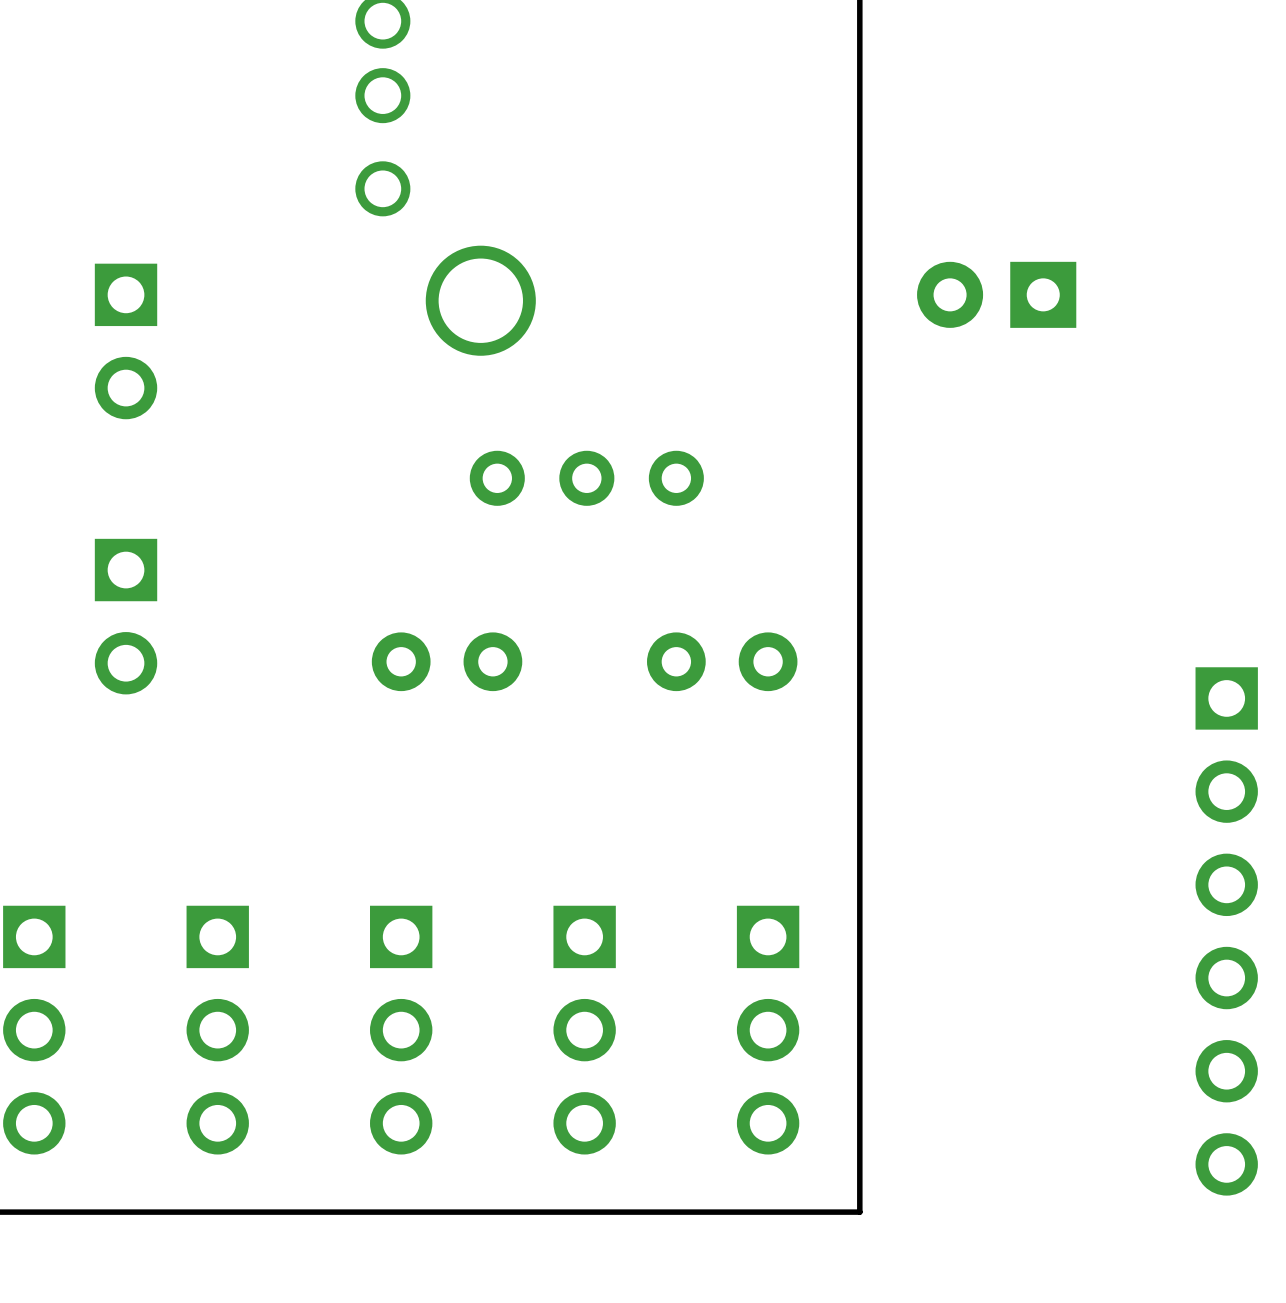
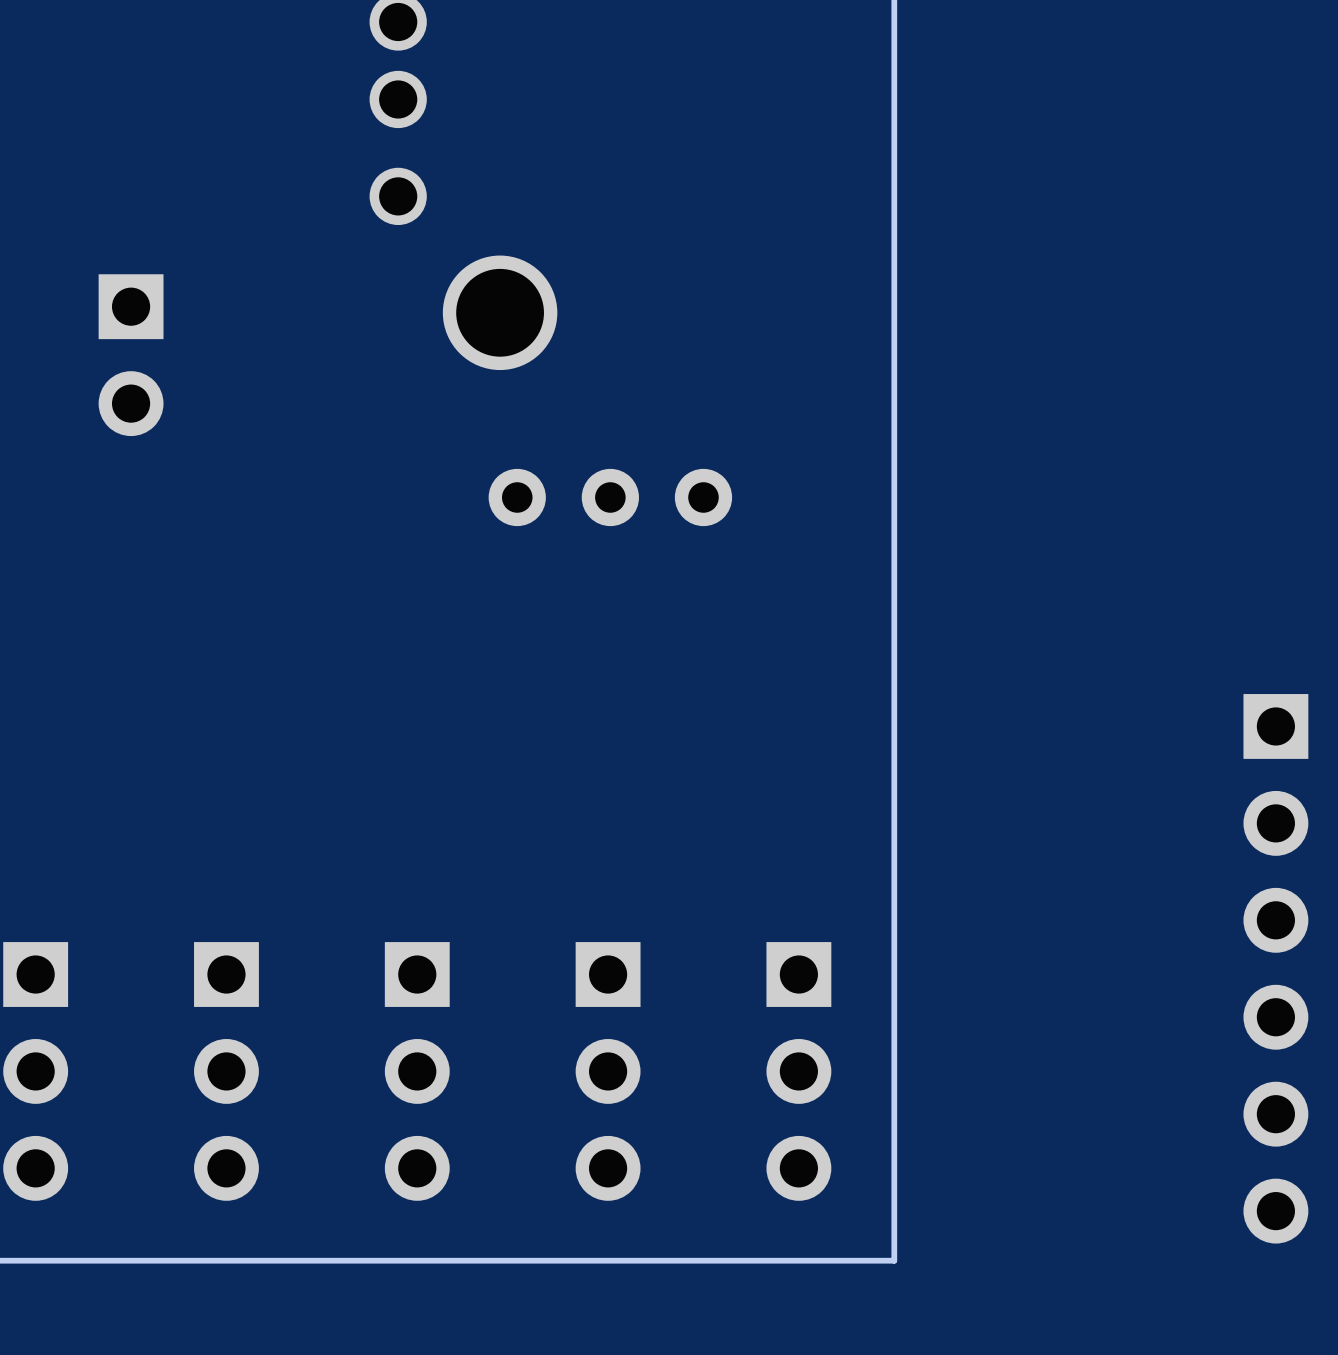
part: (996, 294) -> none
part: (126, 616) -> none
part: (447, 661) -> none
part: (722, 661) -> none

